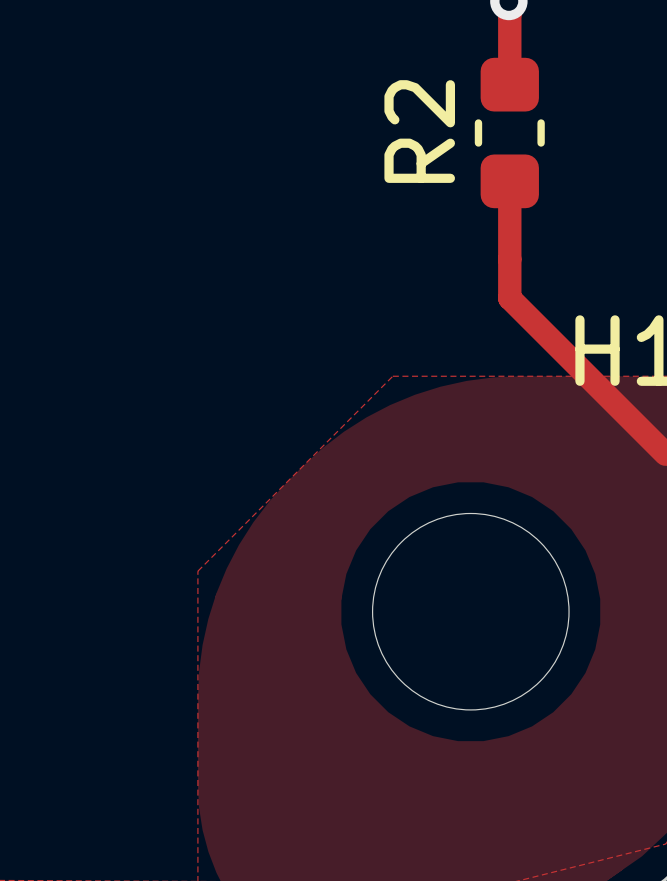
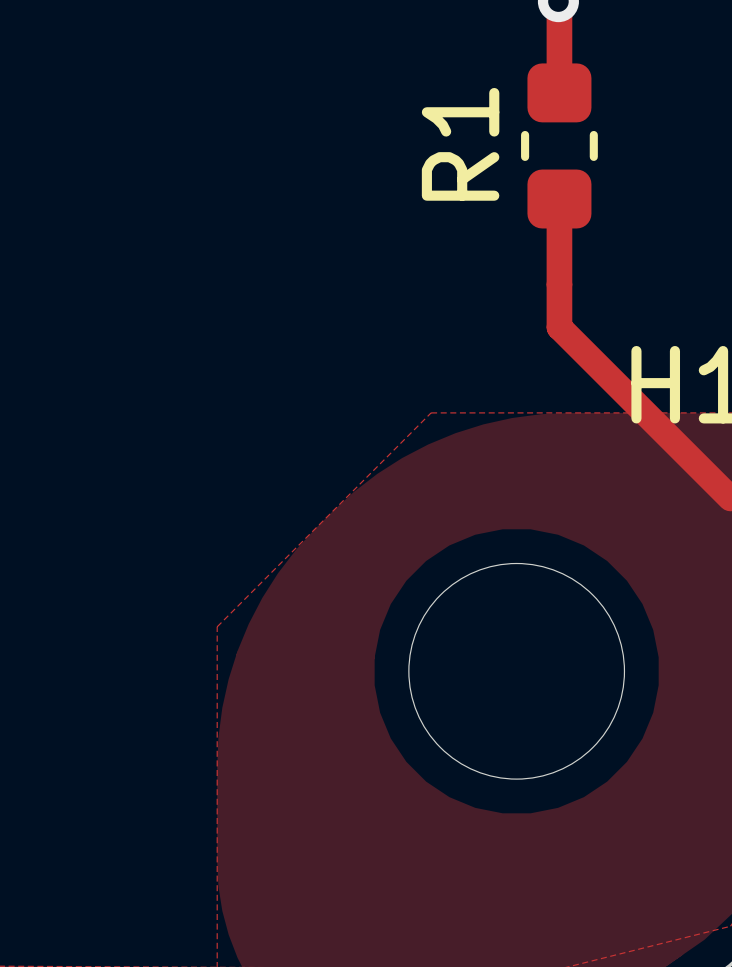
R2 name: R2 (419, 131) -> R1 (460, 144)

